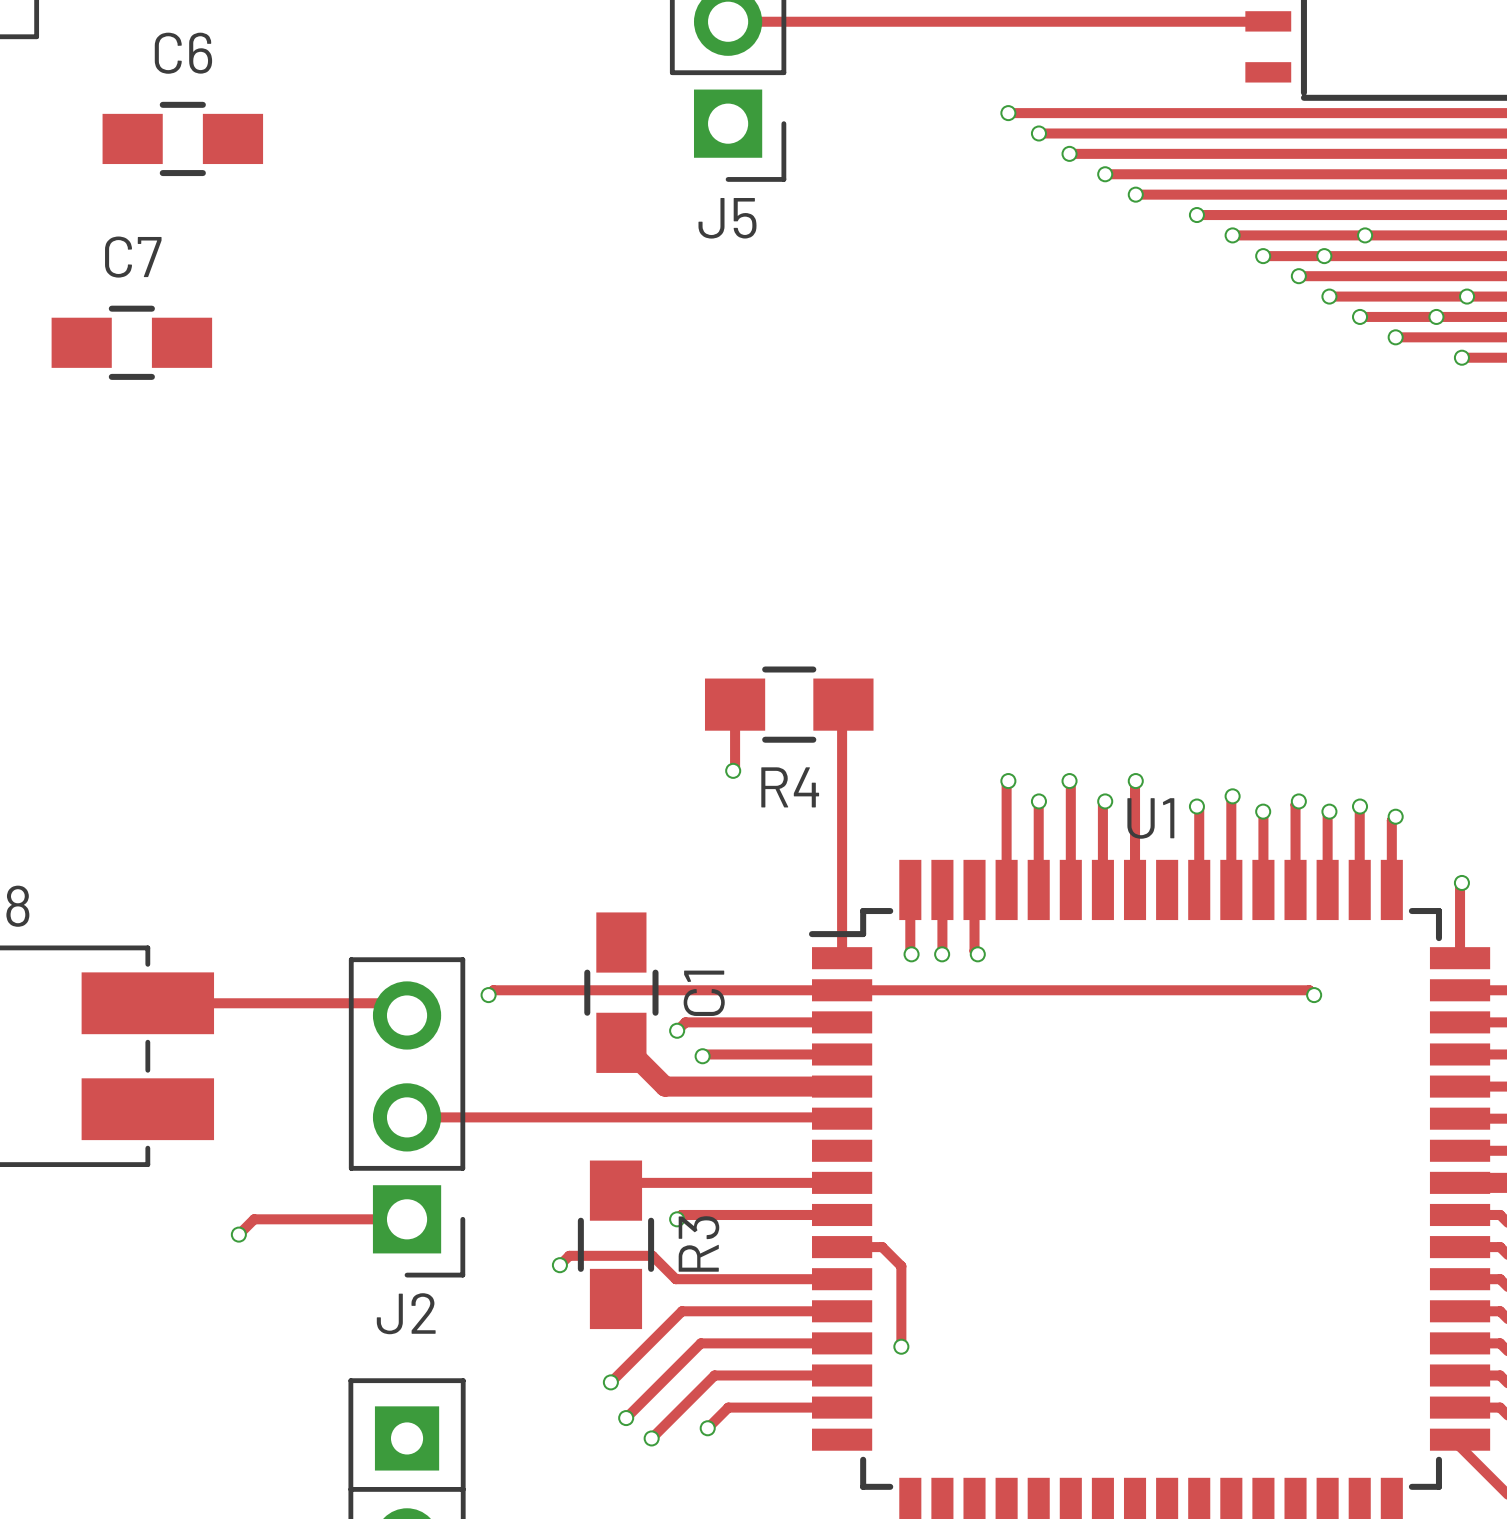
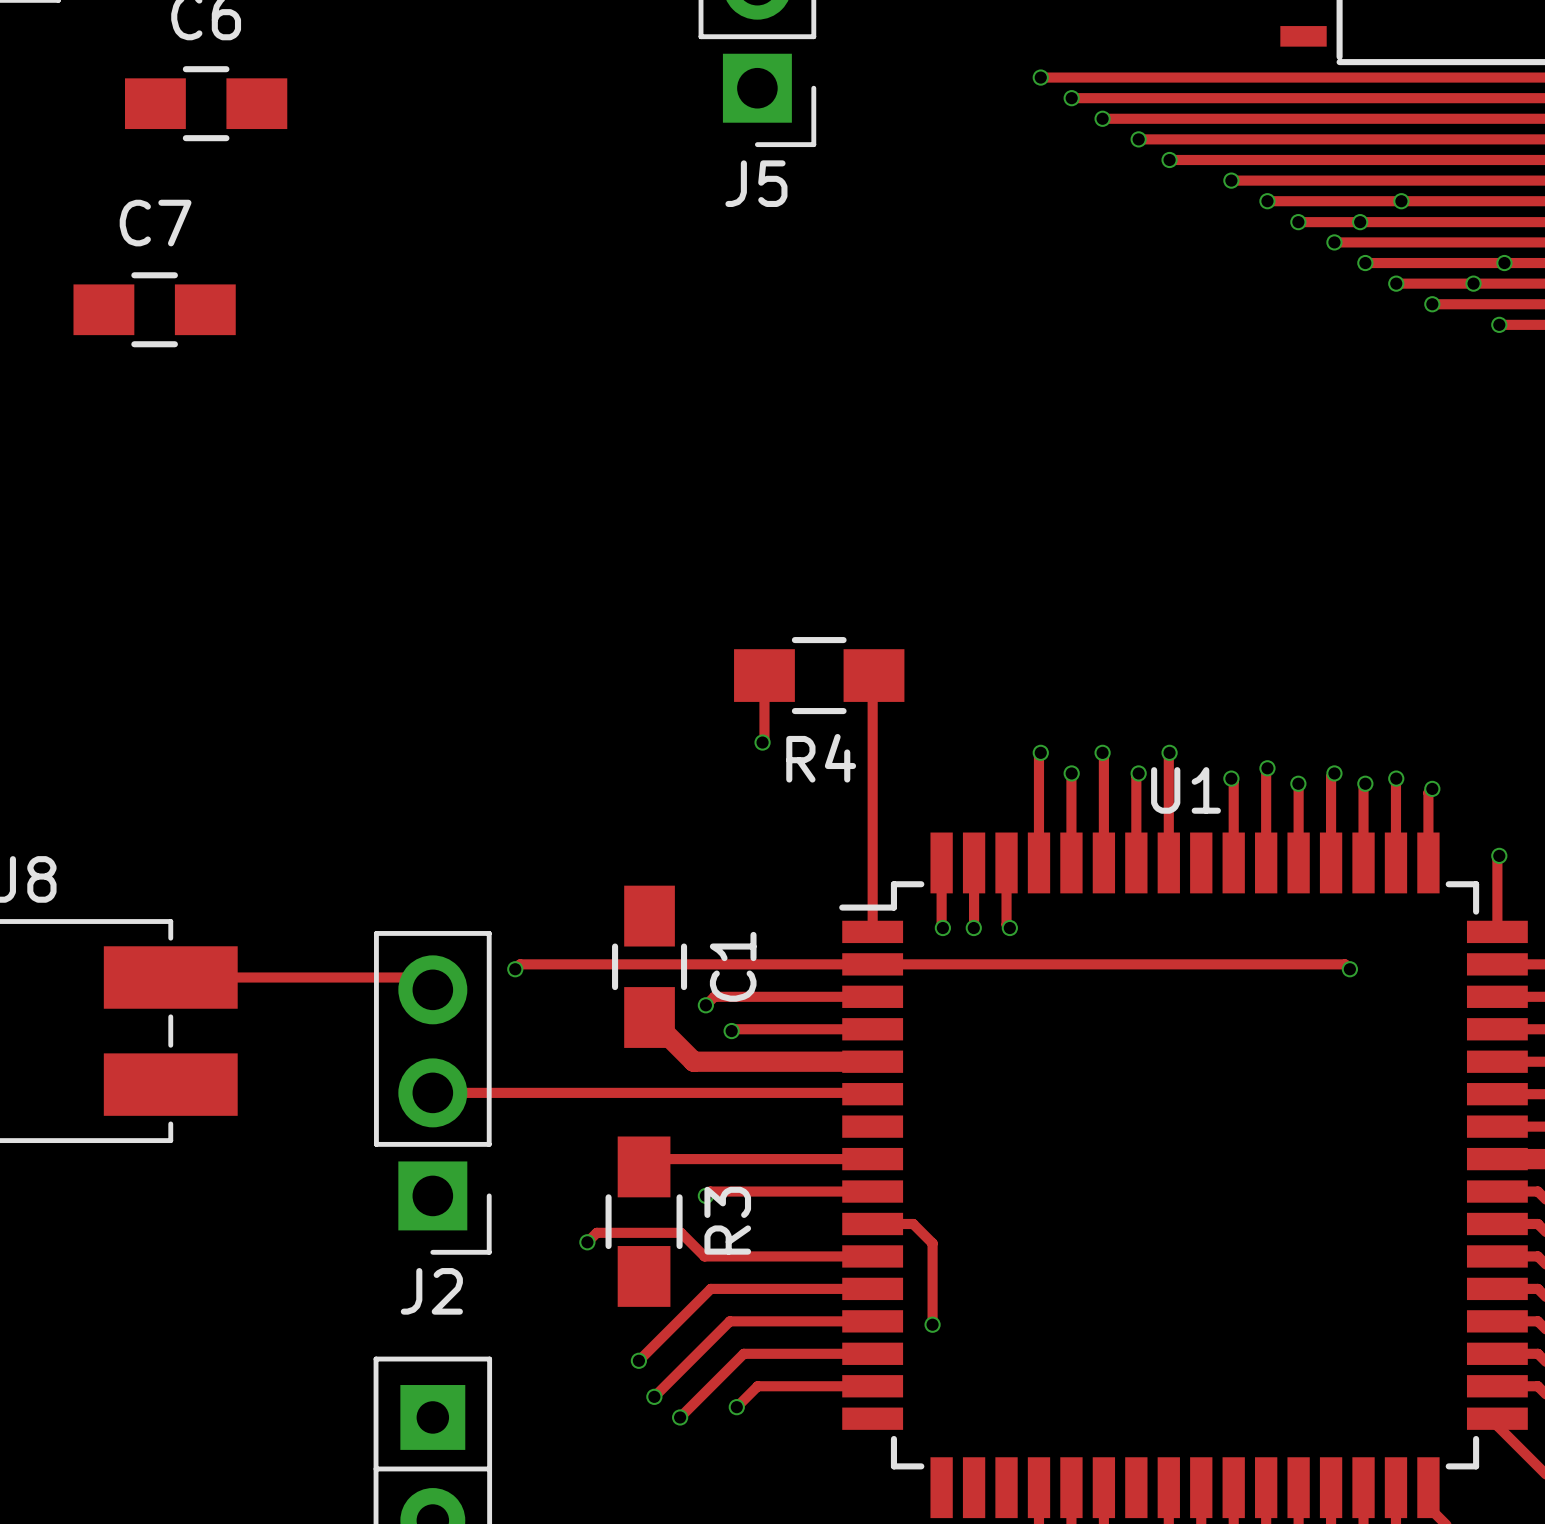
track: (407, 1219) (254, 1219) (238, 1234) -> none
via: (238, 1234) -> none

